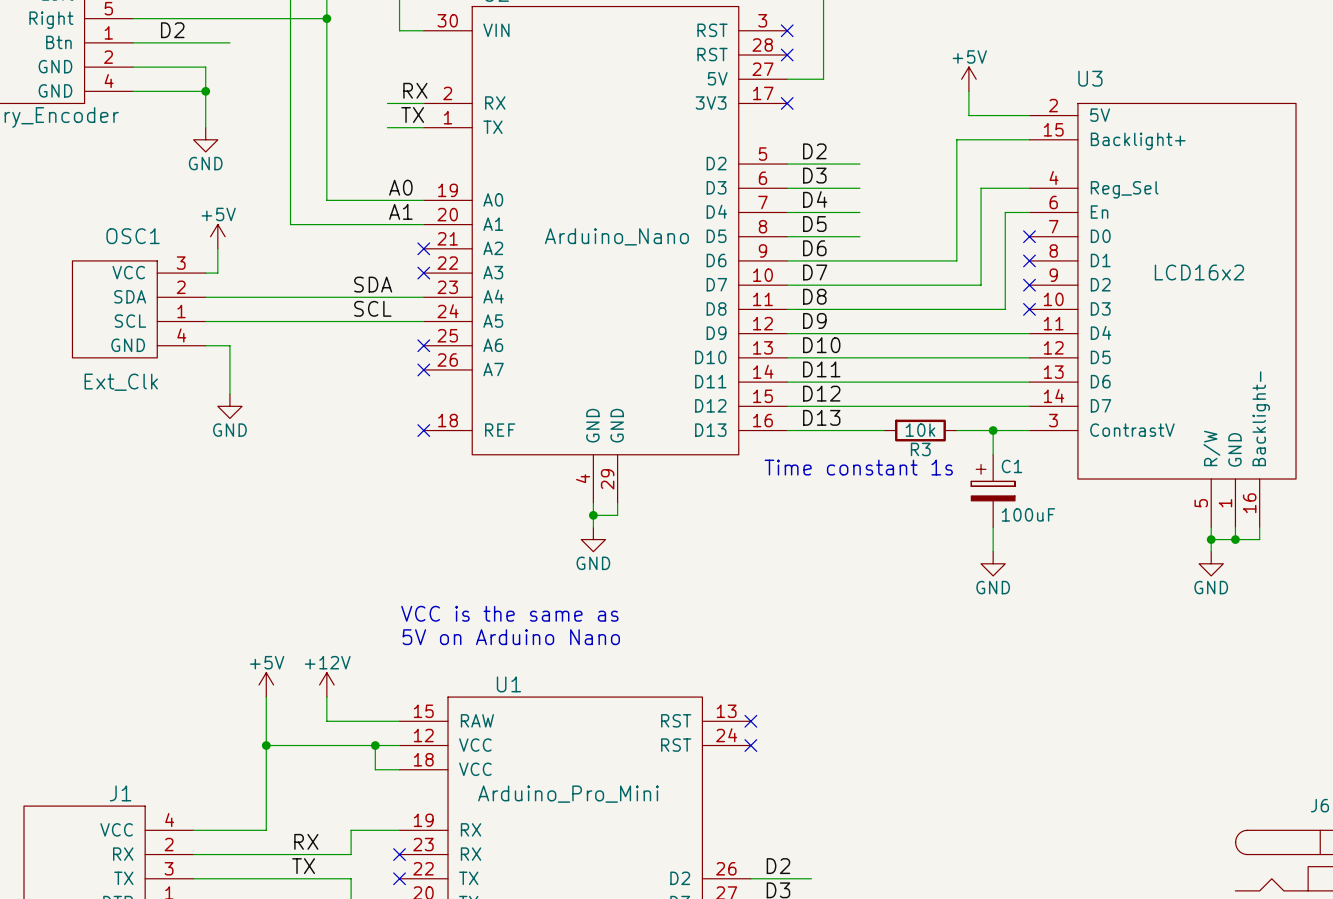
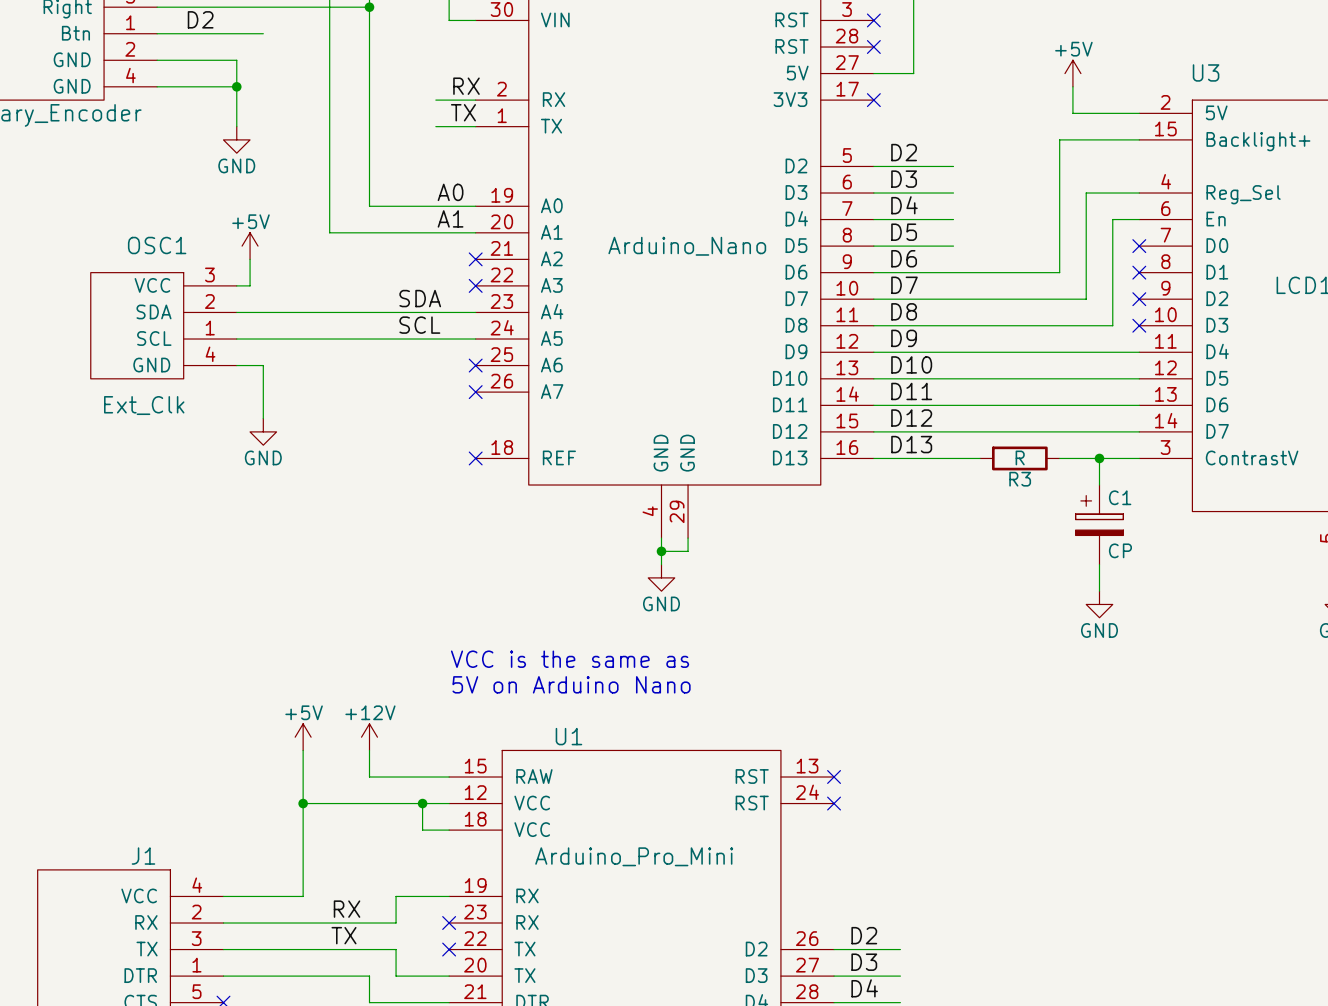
R3 value: 10k (920, 430) -> R (1020, 457)
text: Time constant 1s (858, 467) -> none
C1 value: 100uF (1028, 514) -> CP (1120, 550)

